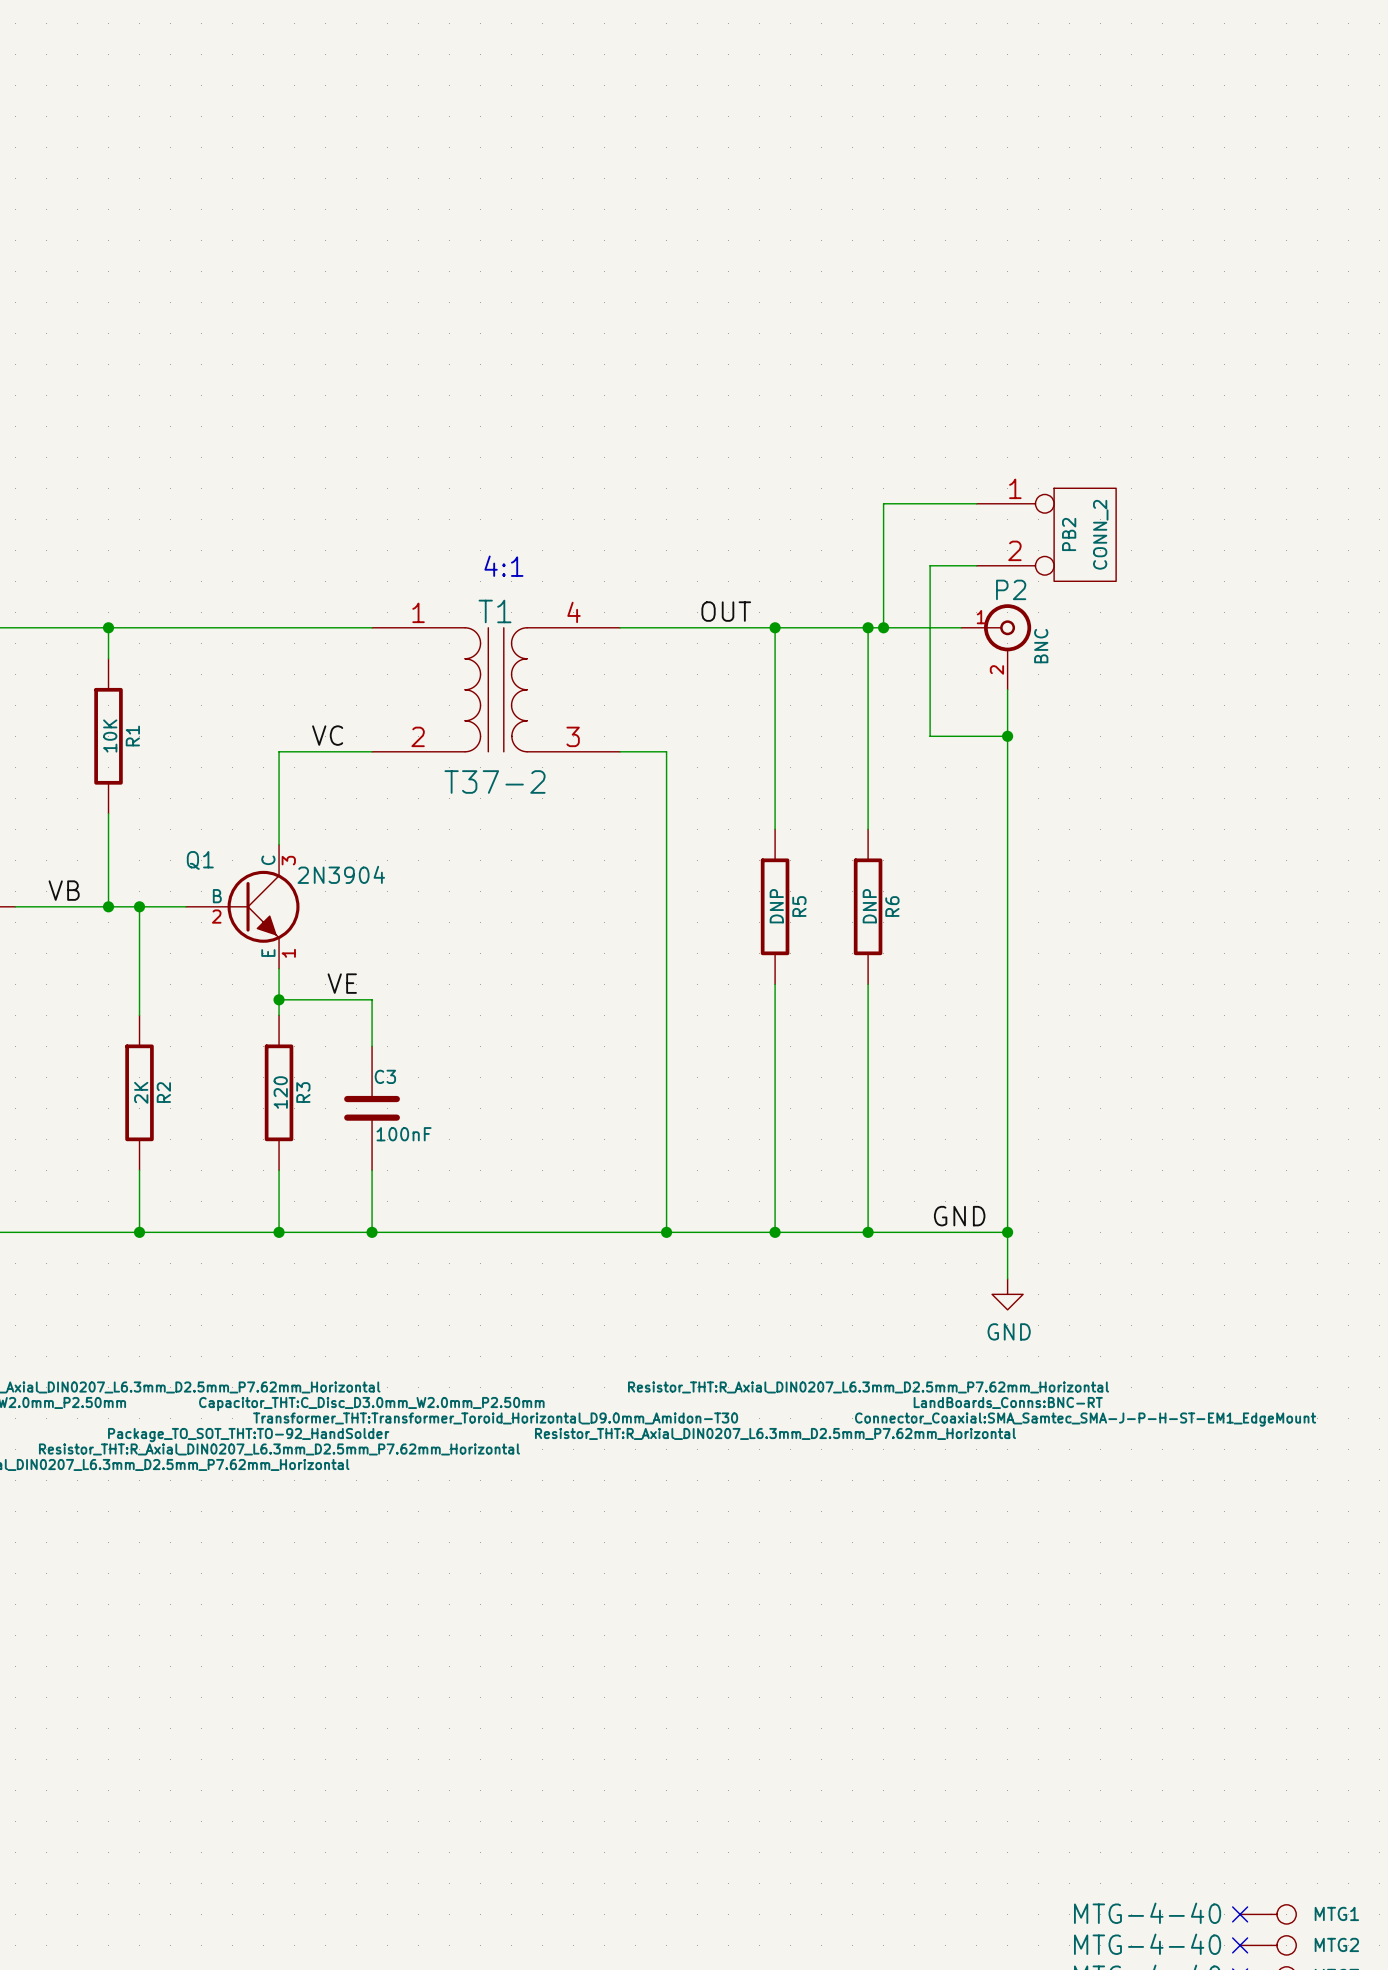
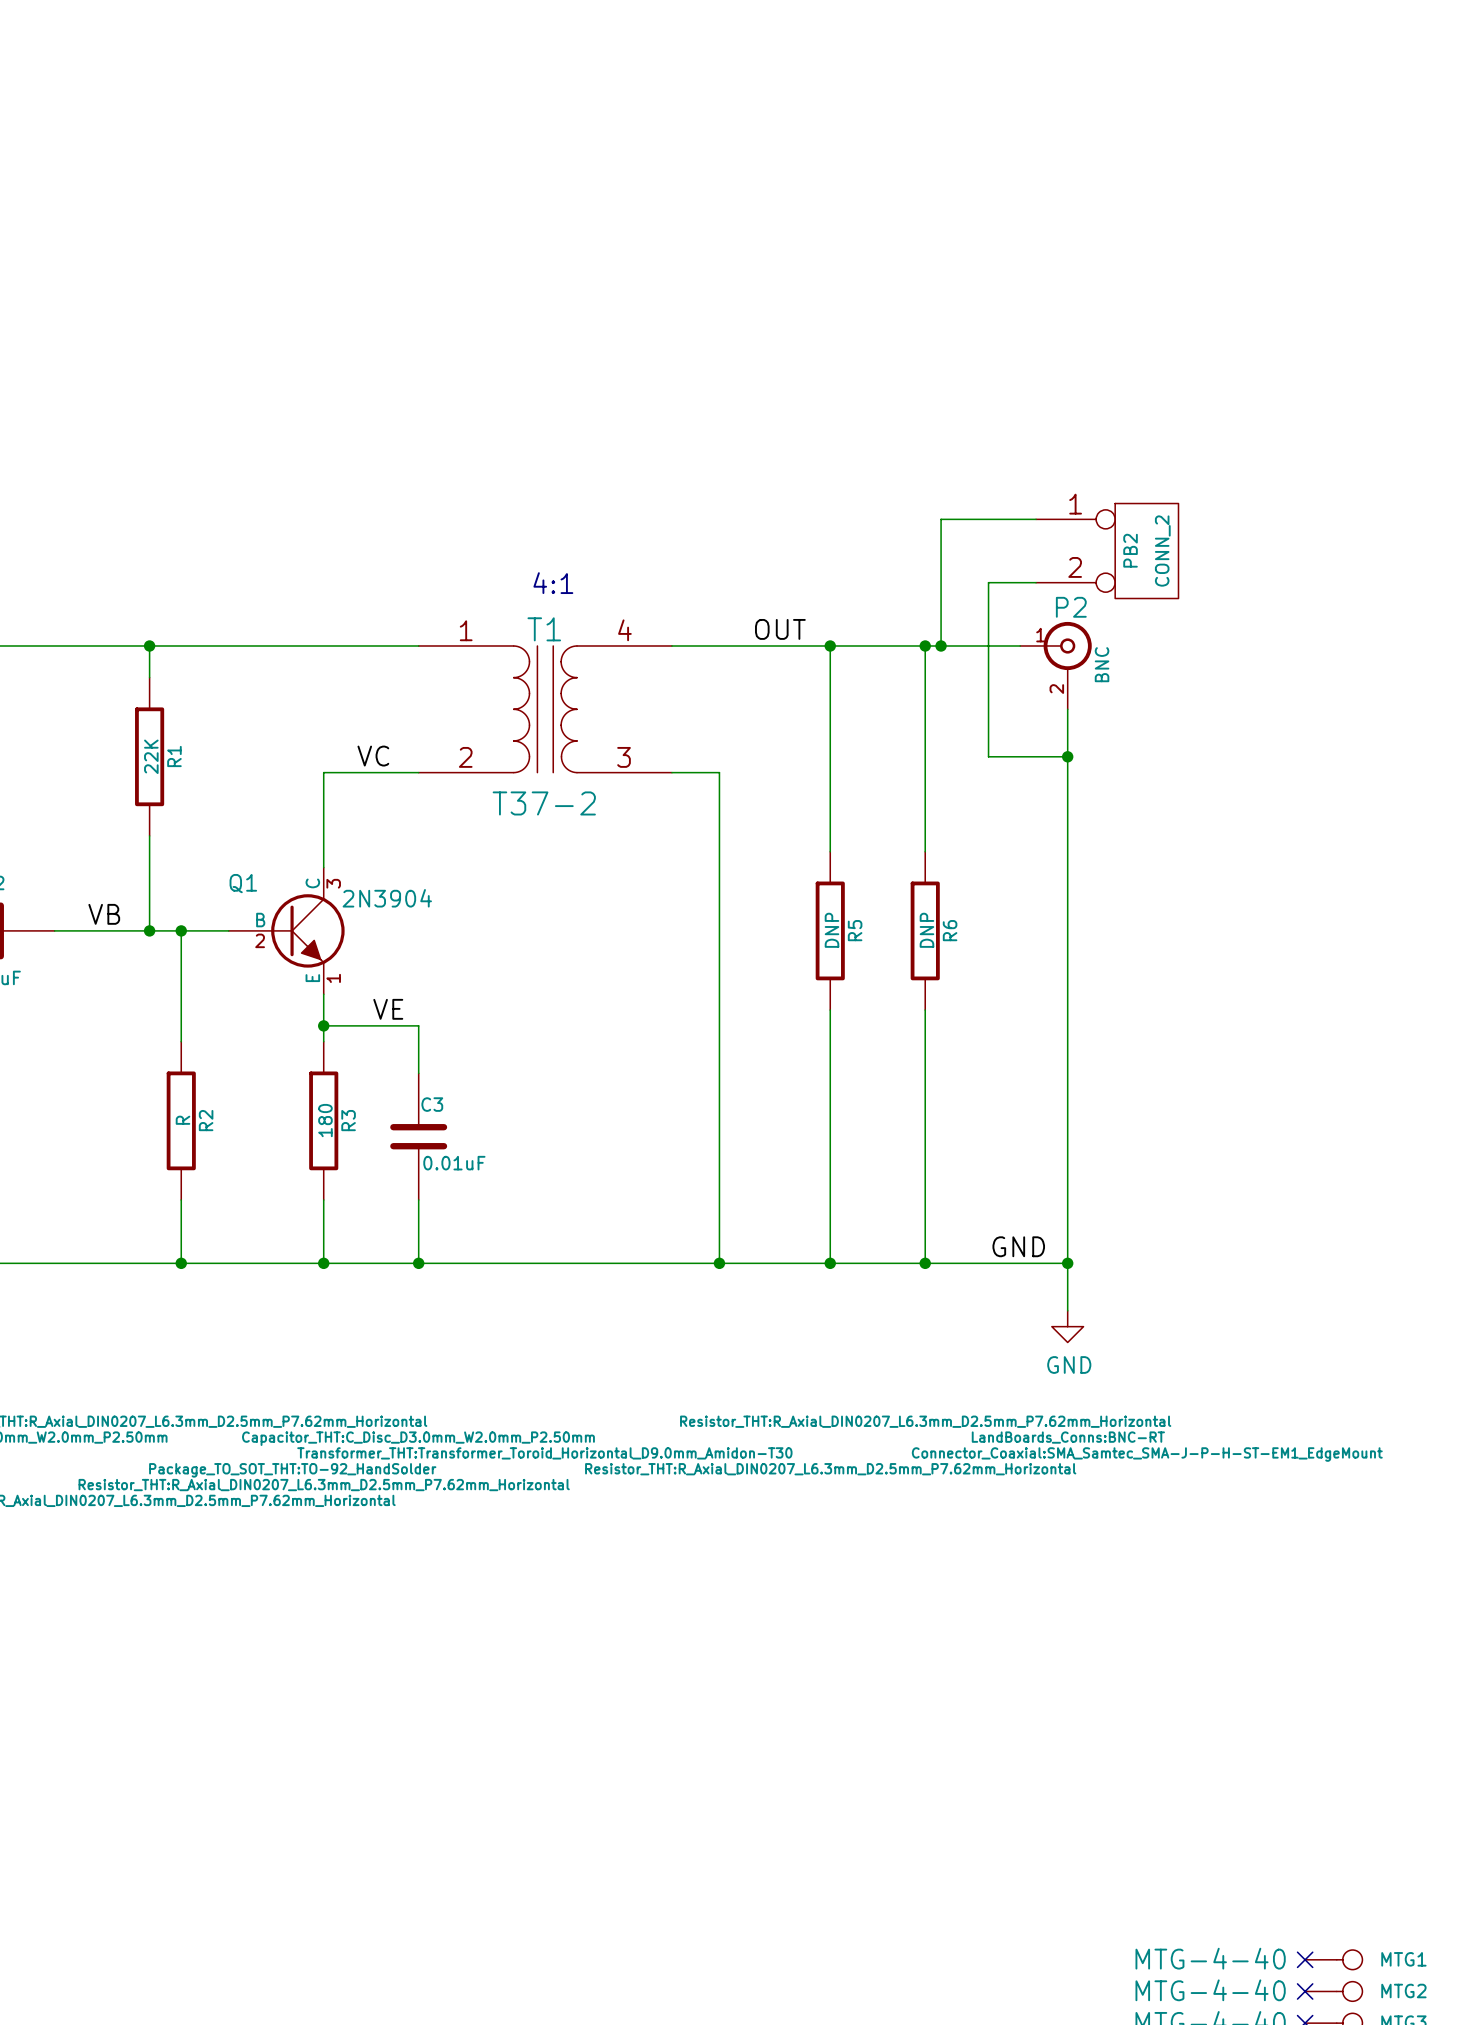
R1 value: 10K (110, 735) -> 22K (151, 756)
R2 value: 2K (141, 1092) -> R (183, 1120)
R3 value: 120 (280, 1092) -> 180 (325, 1120)
C3 value: 100nF (404, 1134) -> 0.01uF (454, 1163)

